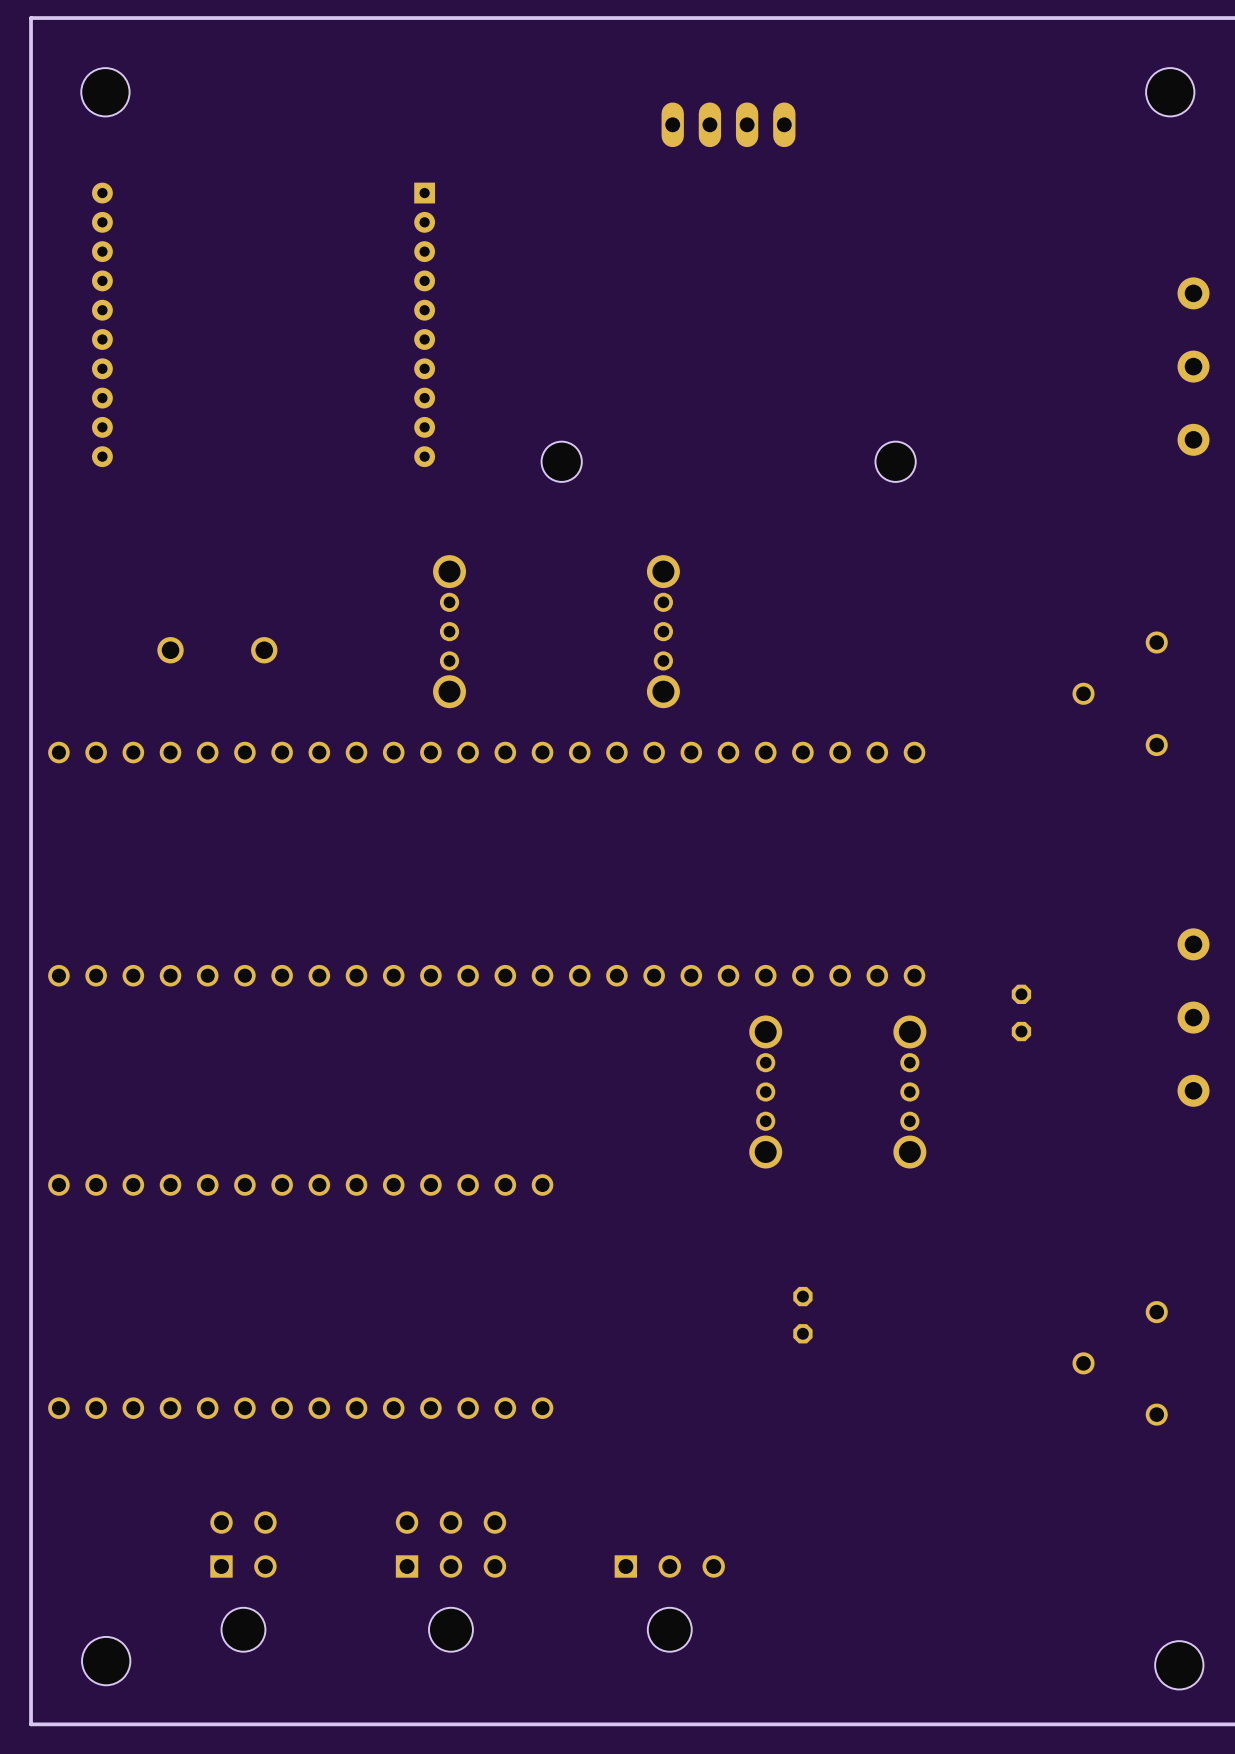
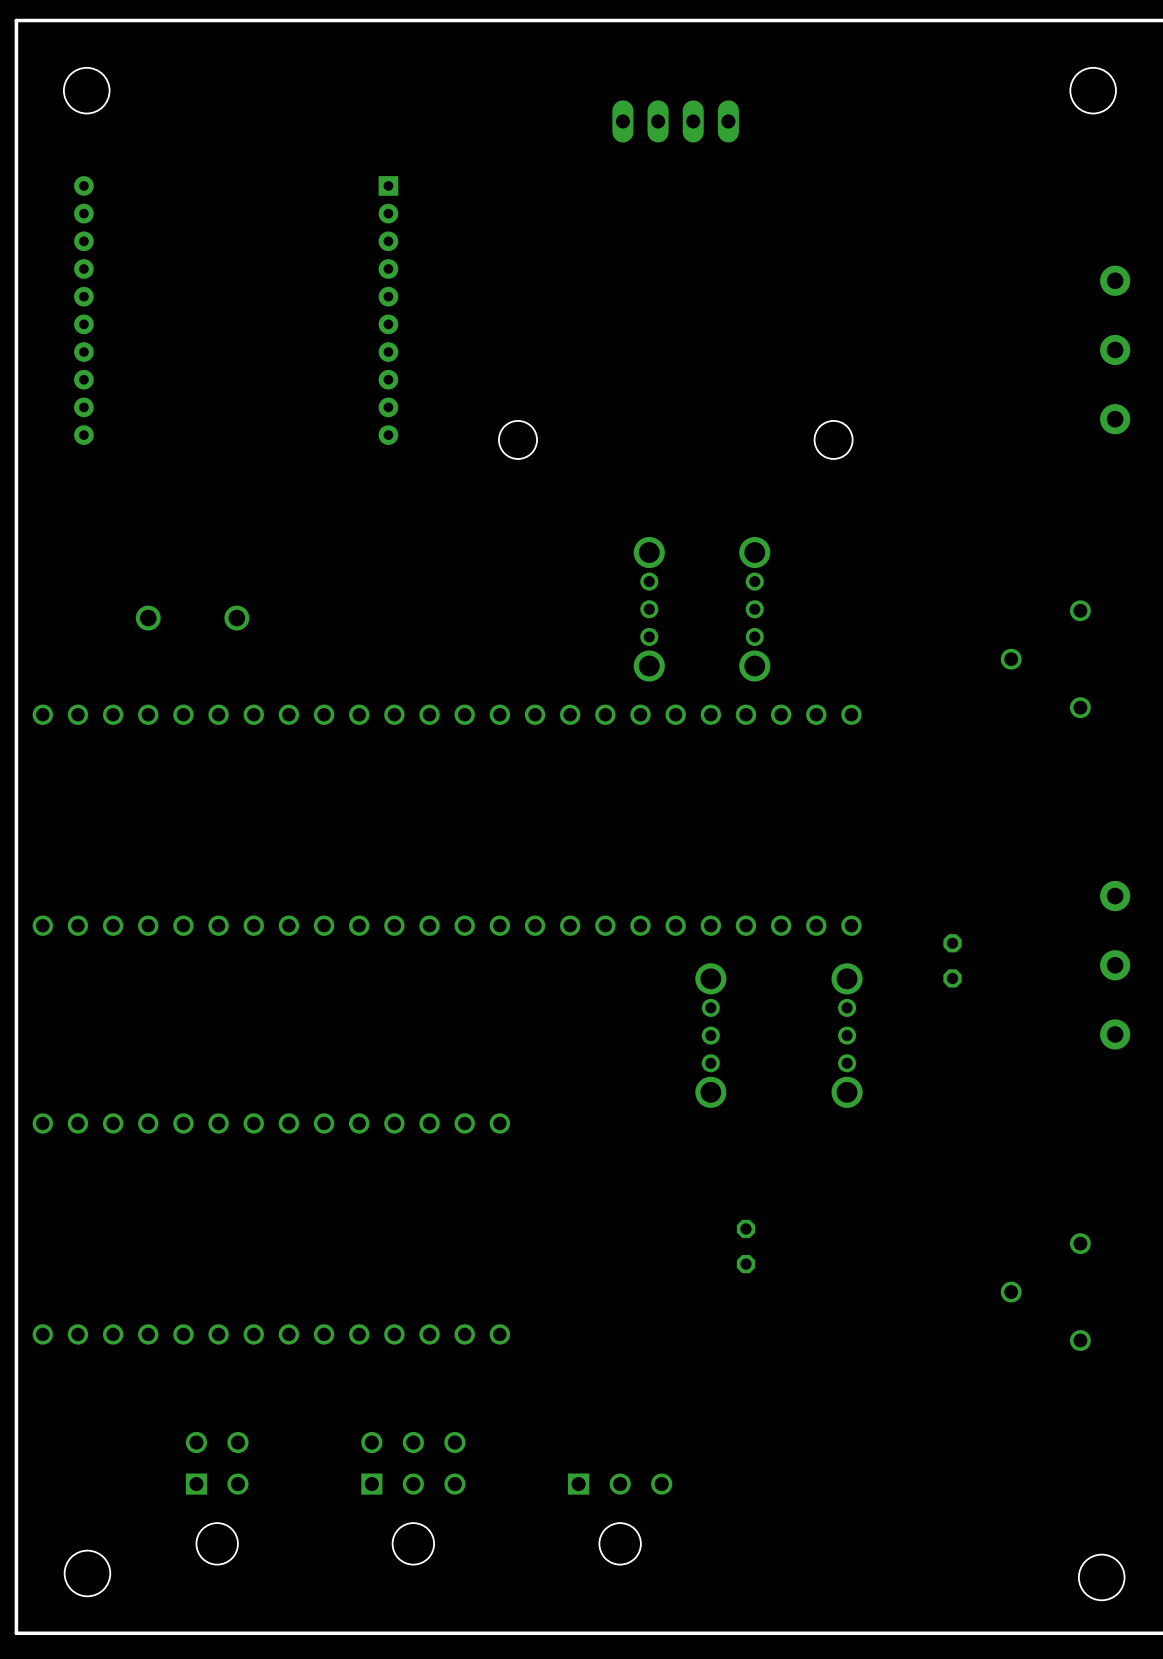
part: (449, 631) -> none
part position: (663, 631) -> (649, 609)
part: none -> (754, 609)

